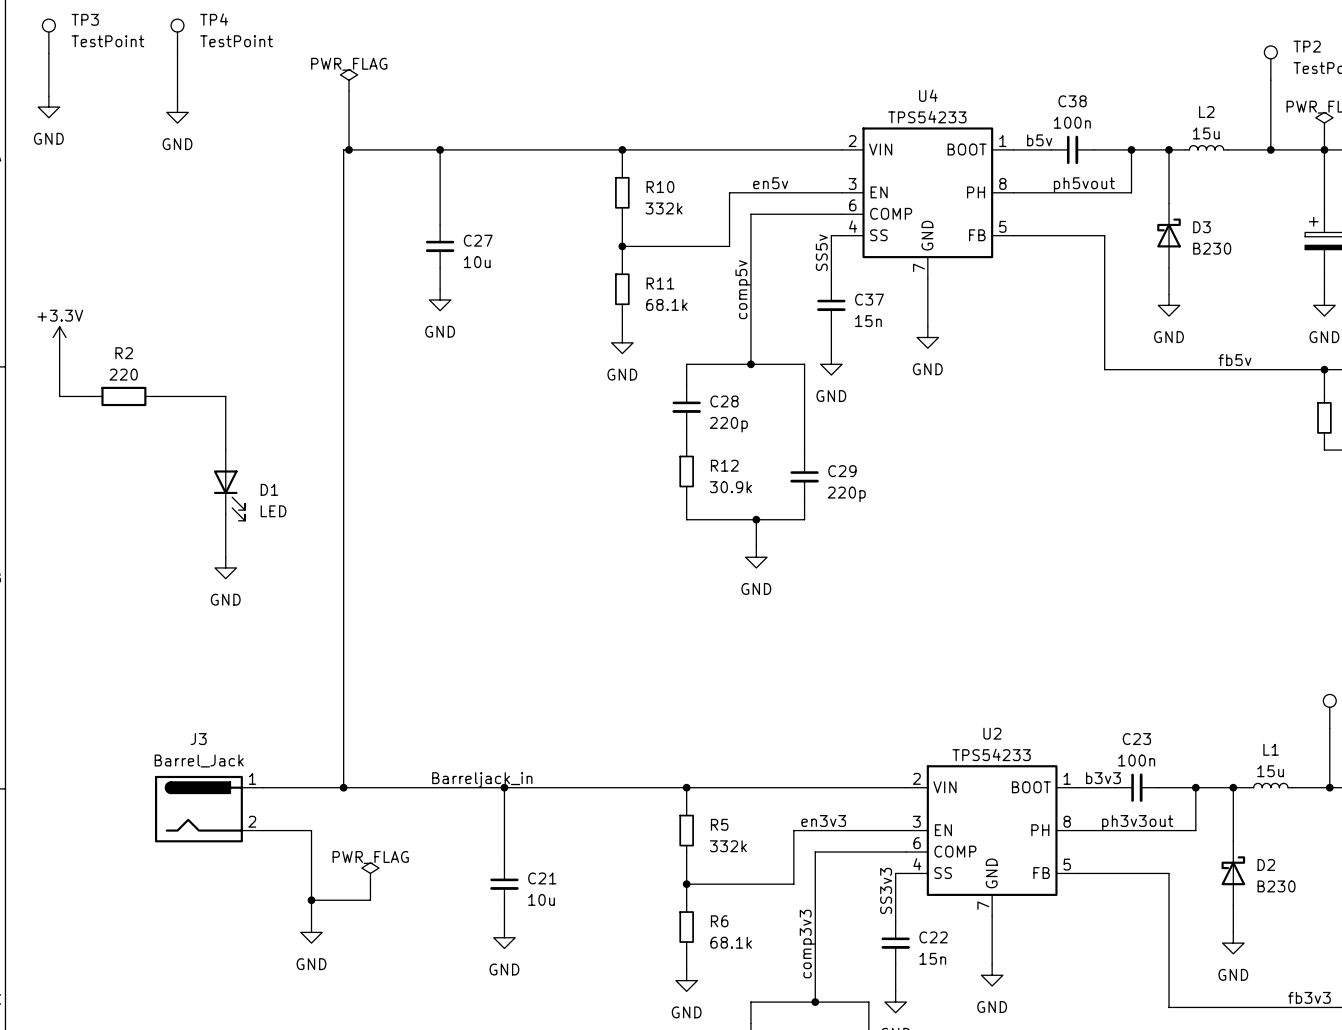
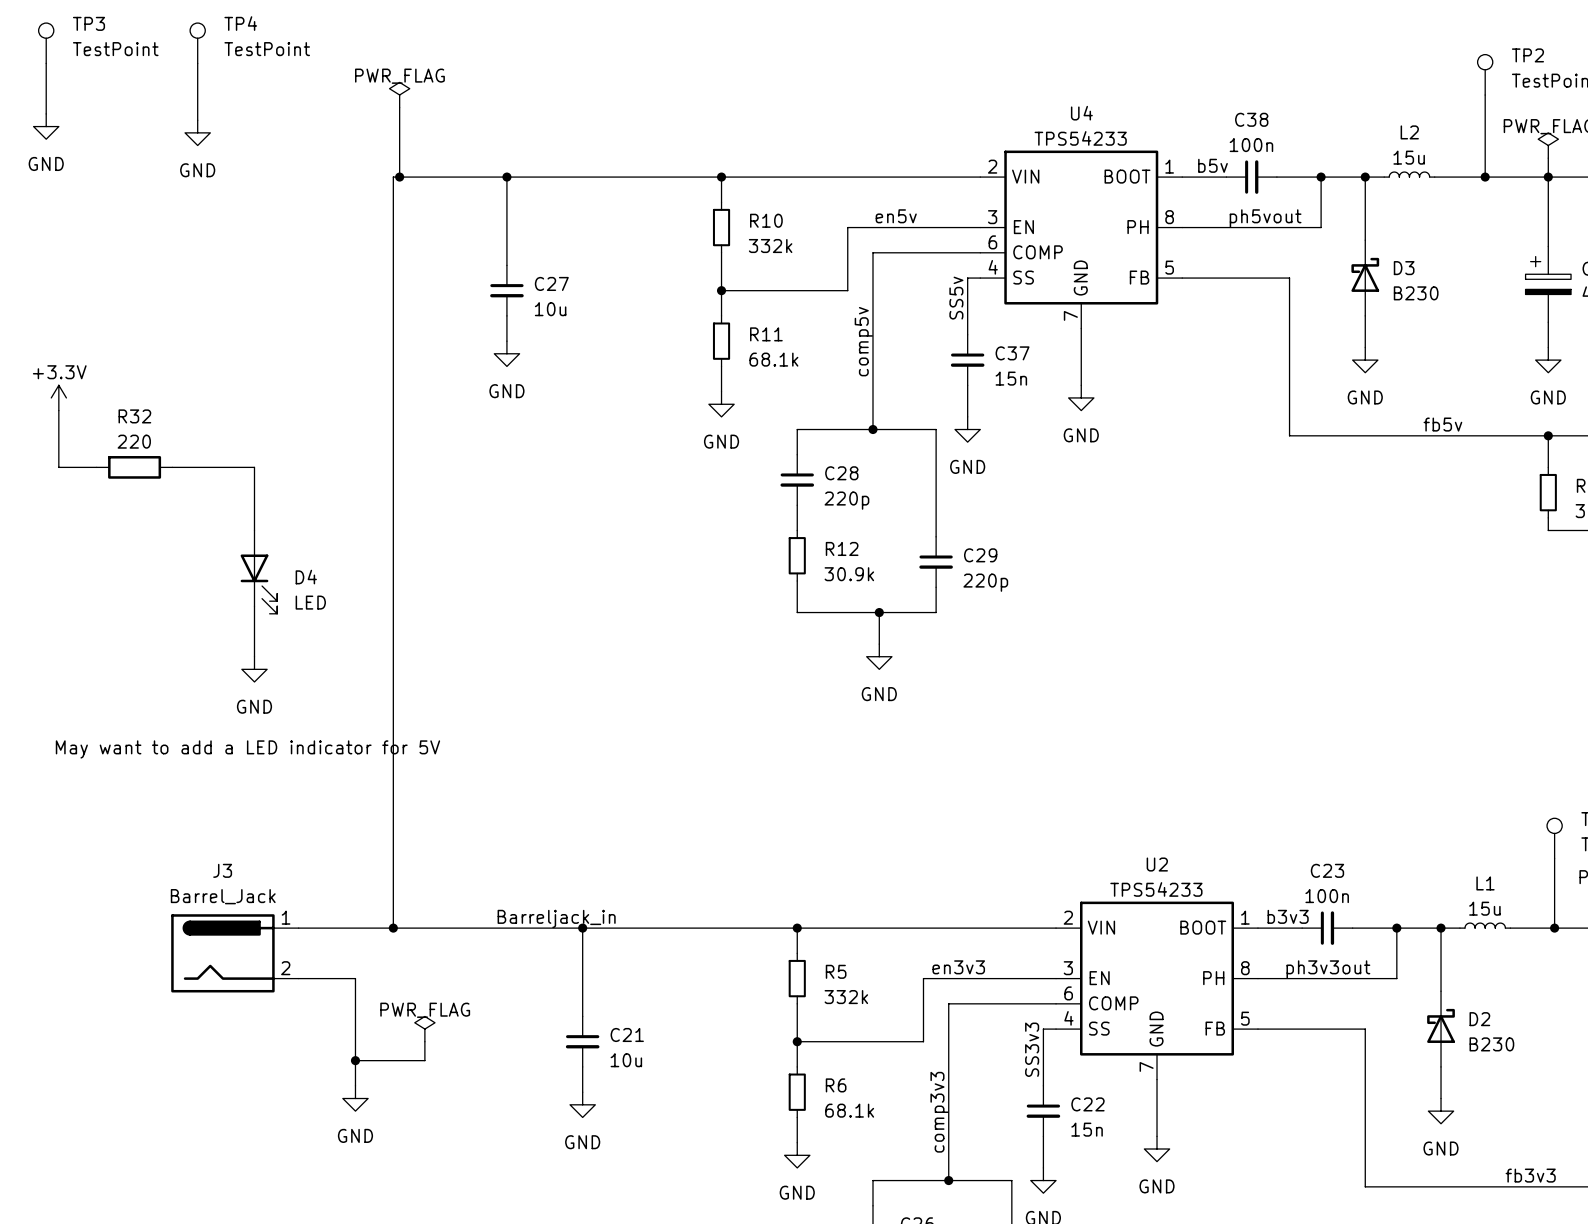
R2 name: R2 (124, 353) -> R32 (134, 416)
D1 name: D1 (269, 489) -> D4 (306, 577)
text: none -> May want to add a LED indicator for 5V (247, 749)

